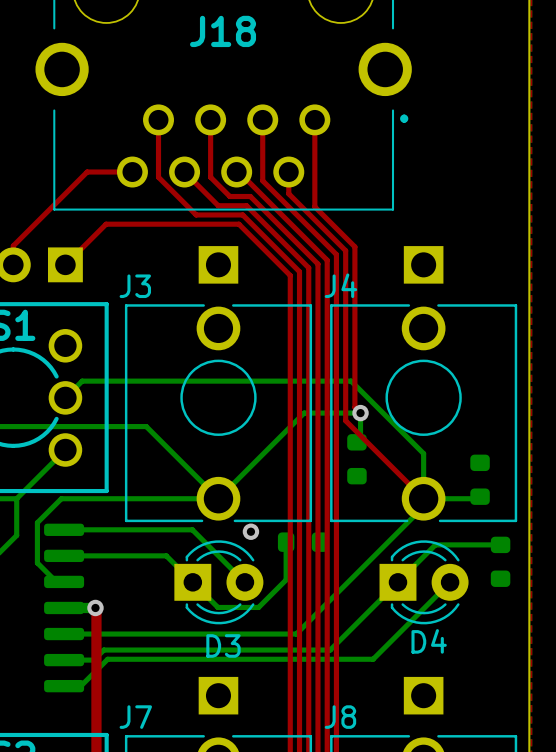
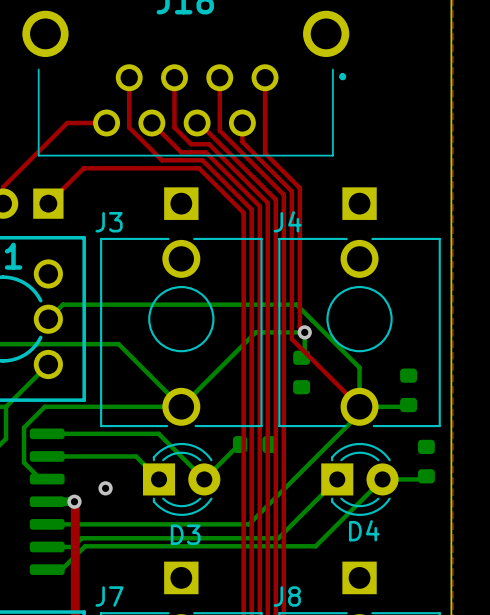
via: (250, 531) -> none
bottom track: none -> (242, 443) (239, 443) (204, 479)
bottom track: (286, 542) (286, 579) (258, 607) (217, 607) (192, 582) -> none
bottom track: (500, 544) (435, 544) (397, 582) -> none
bottom track: none -> (426, 476) (423, 479) (382, 479)
via: none -> (105, 488)

